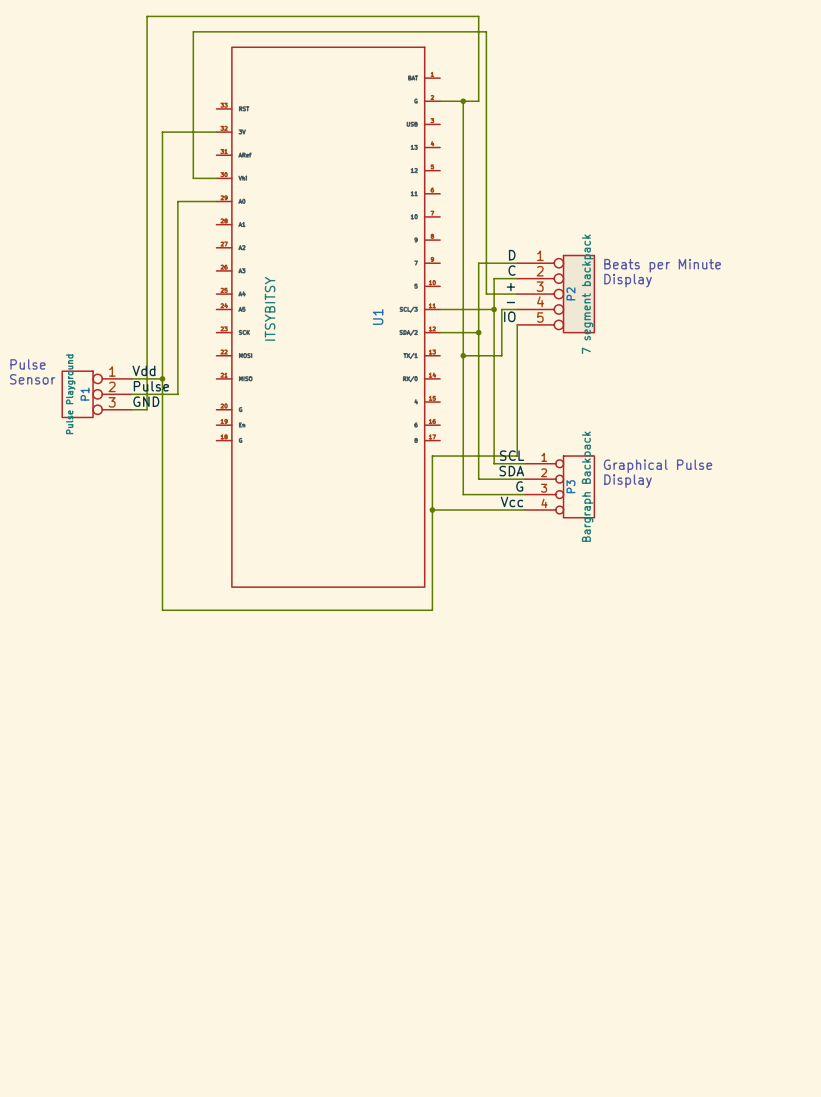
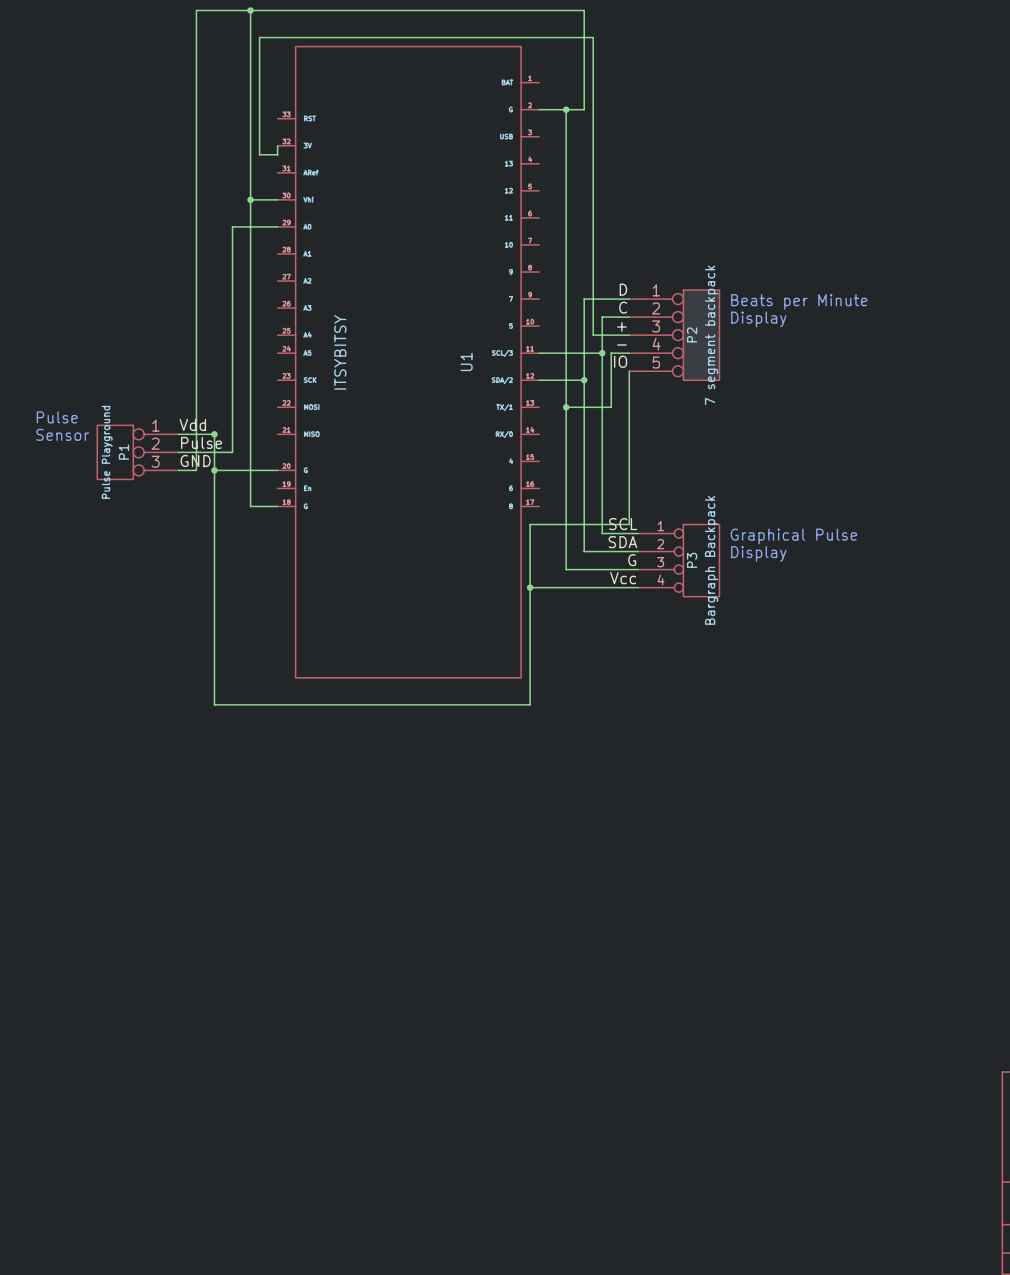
wire: none -> (250, 10) (250, 28)
junction: none -> (250, 10)
wire: (193, 31) (486, 31) (486, 39) -> (277, 145) (277, 154) (259, 154) (259, 37) (593, 37)
wire: (216, 132) (162, 132) (162, 378) -> none
wire: none -> (250, 199) (250, 506) (277, 506)
junction: none -> (250, 199)
wire: none -> (214, 470) (277, 470)
junction: none -> (214, 470)

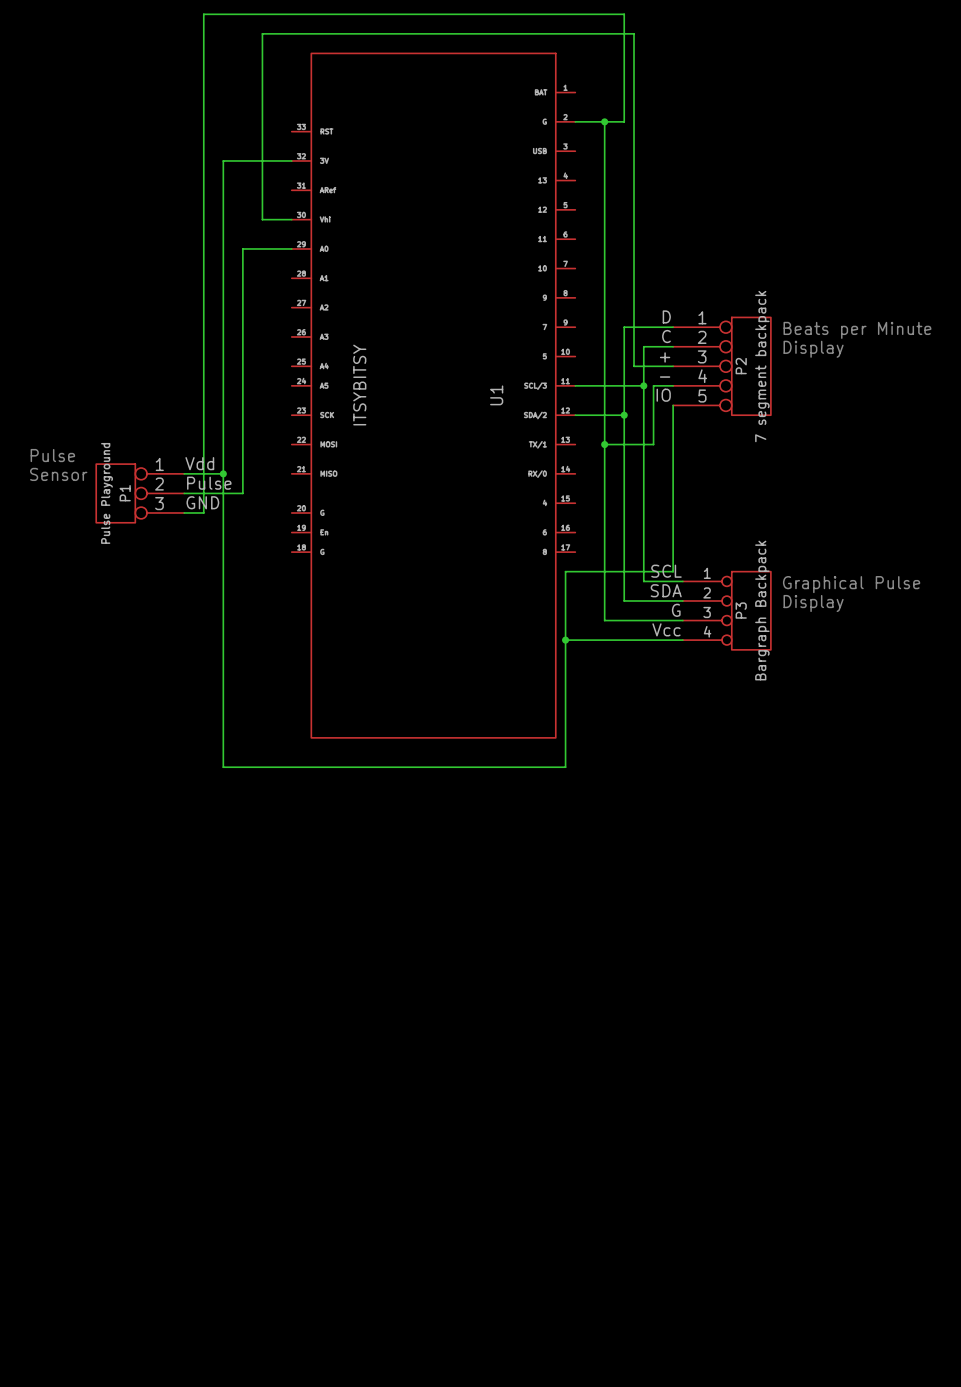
wire: (250, 10) (250, 28) -> none
junction: (250, 10) -> none
wire: (593, 37) (259, 37) (259, 154) (277, 154) (277, 145) -> (634, 43) (634, 33) (262, 33)
wire: none -> (291, 160) (223, 160) (223, 473)
wire: (250, 199) (250, 506) (277, 506) -> none
junction: (250, 199) -> none
wire: (214, 470) (277, 470) -> none
junction: (214, 470) -> none

